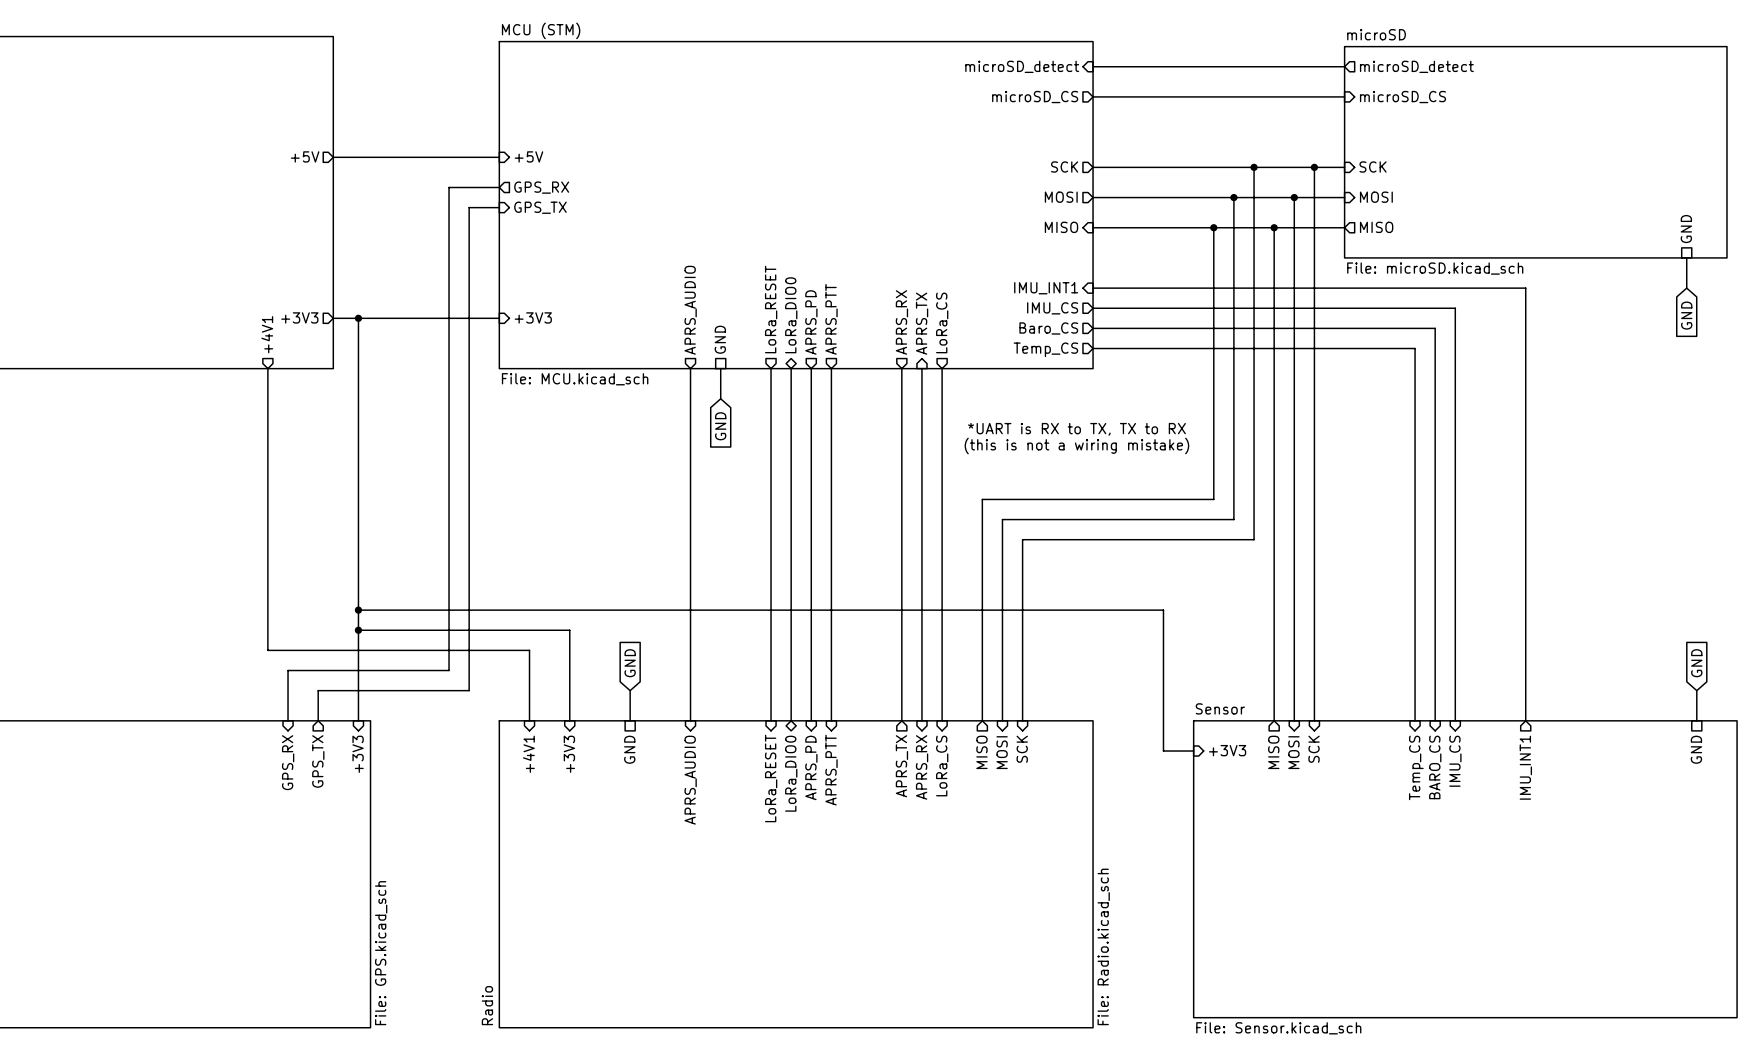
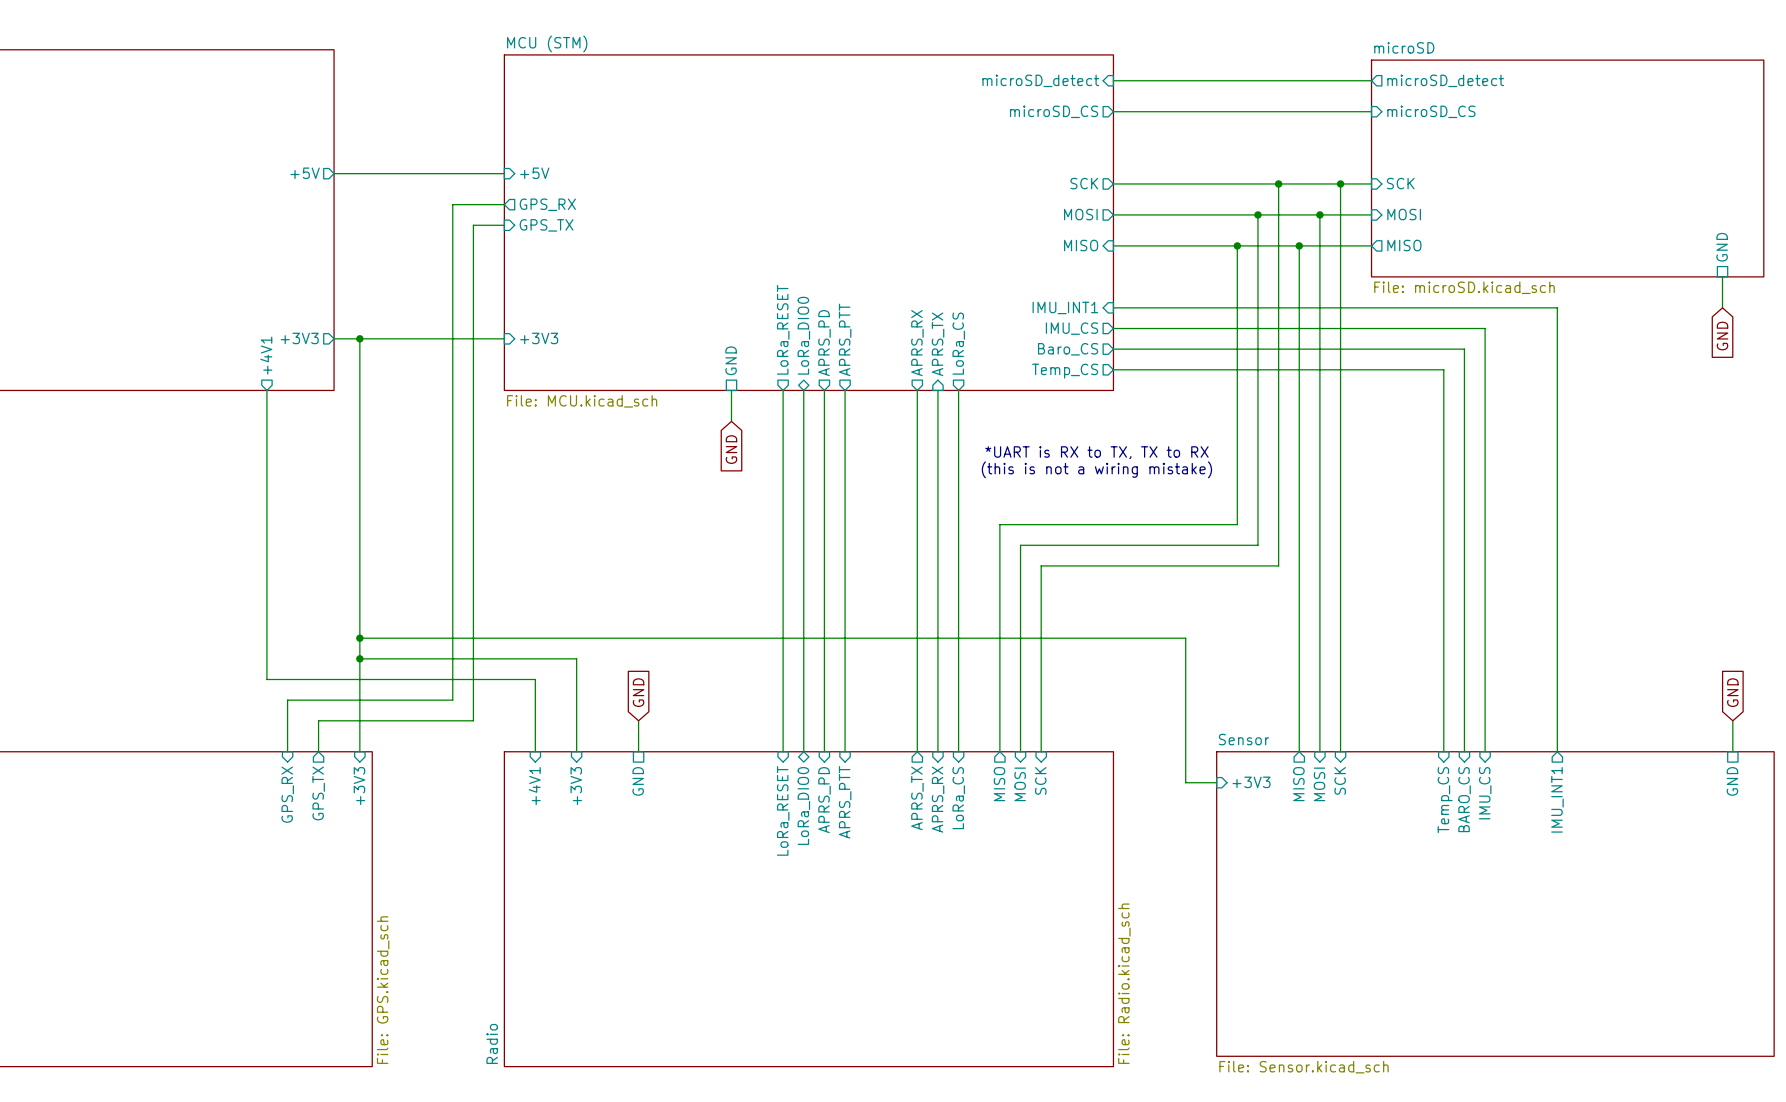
sheet pin: APRS_AUDIO (690, 310) -> none
wire: (690, 368) (690, 720) -> none
sheet pin: APRS_AUDIO (690, 780) -> none

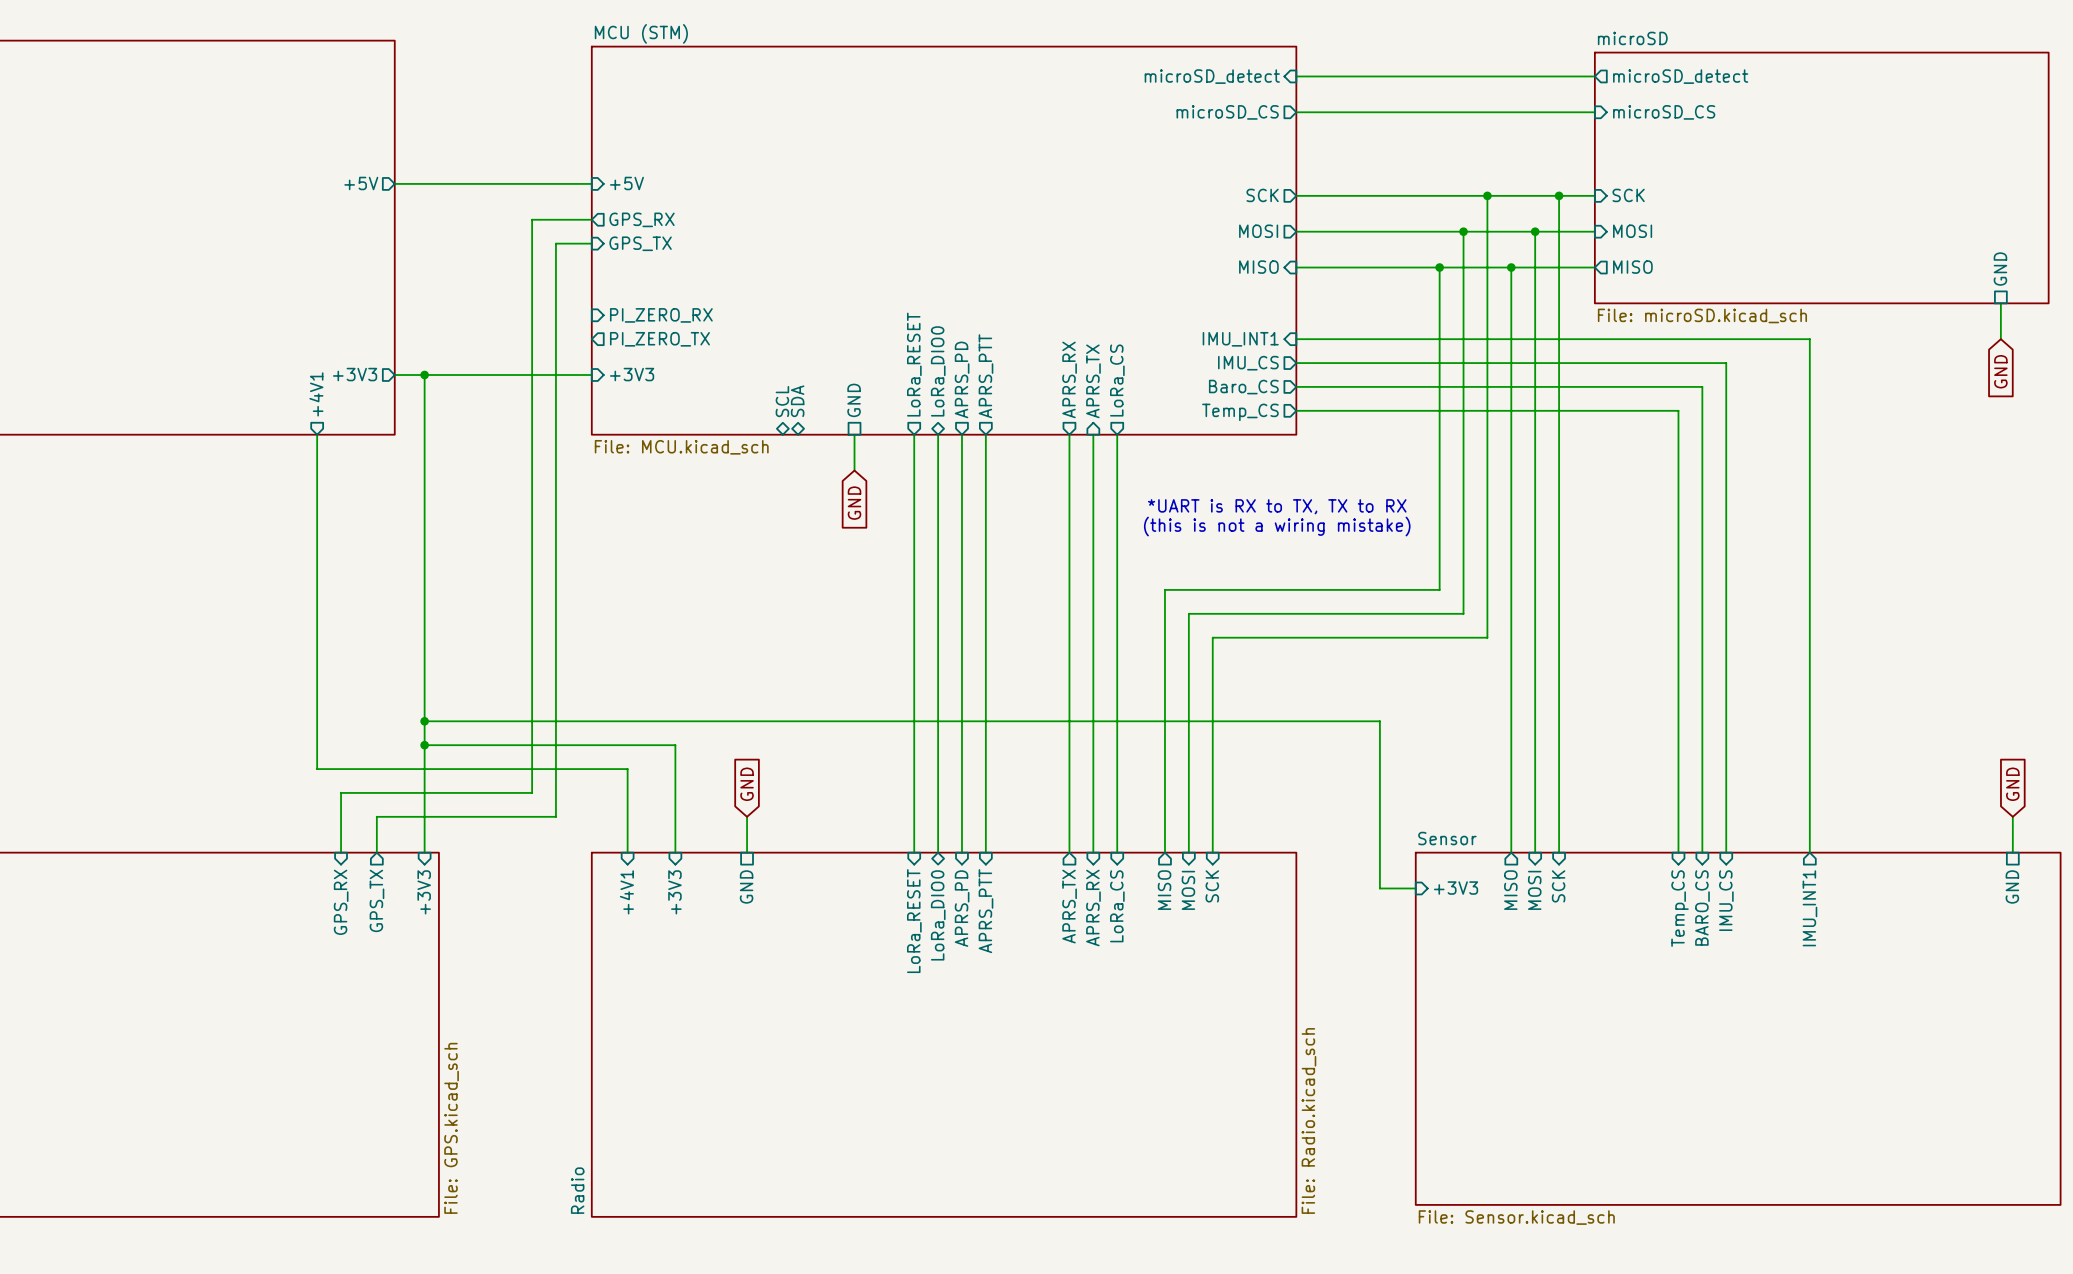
sheet pin: none -> PI_ZERO_RX (661, 315)
sheet pin: none -> PI_ZERO_TX (659, 339)
sheet pin: none -> SCL (782, 401)
sheet pin: none -> SDA (797, 401)

